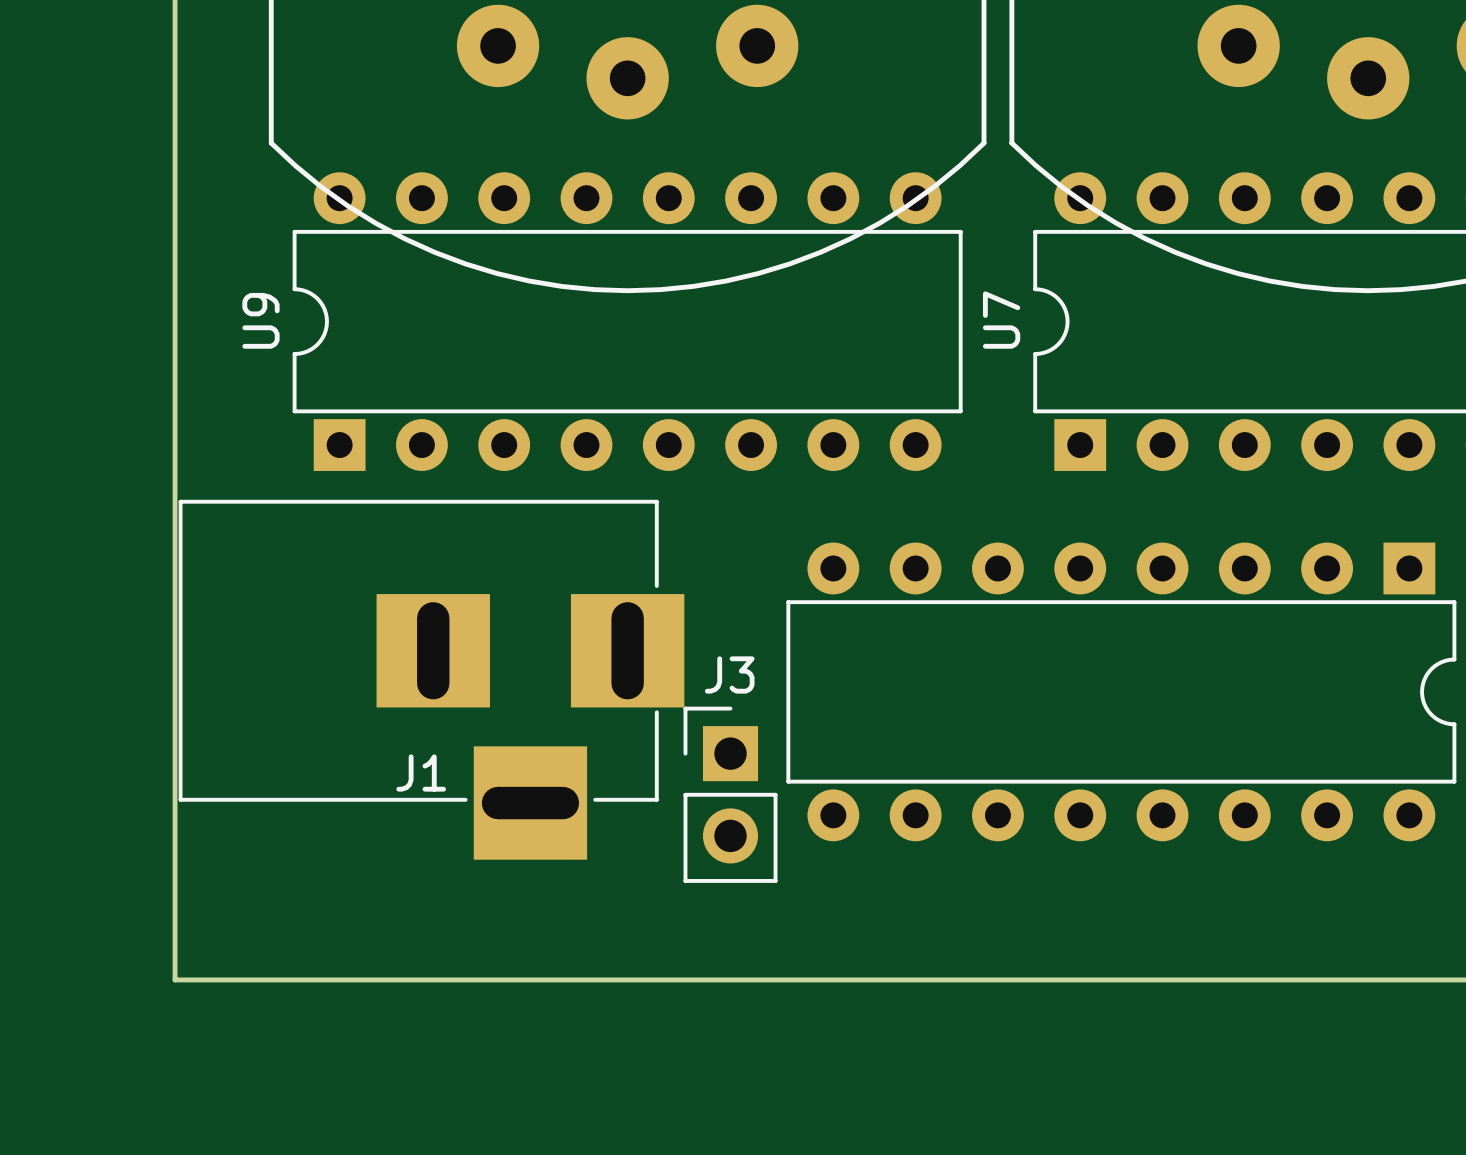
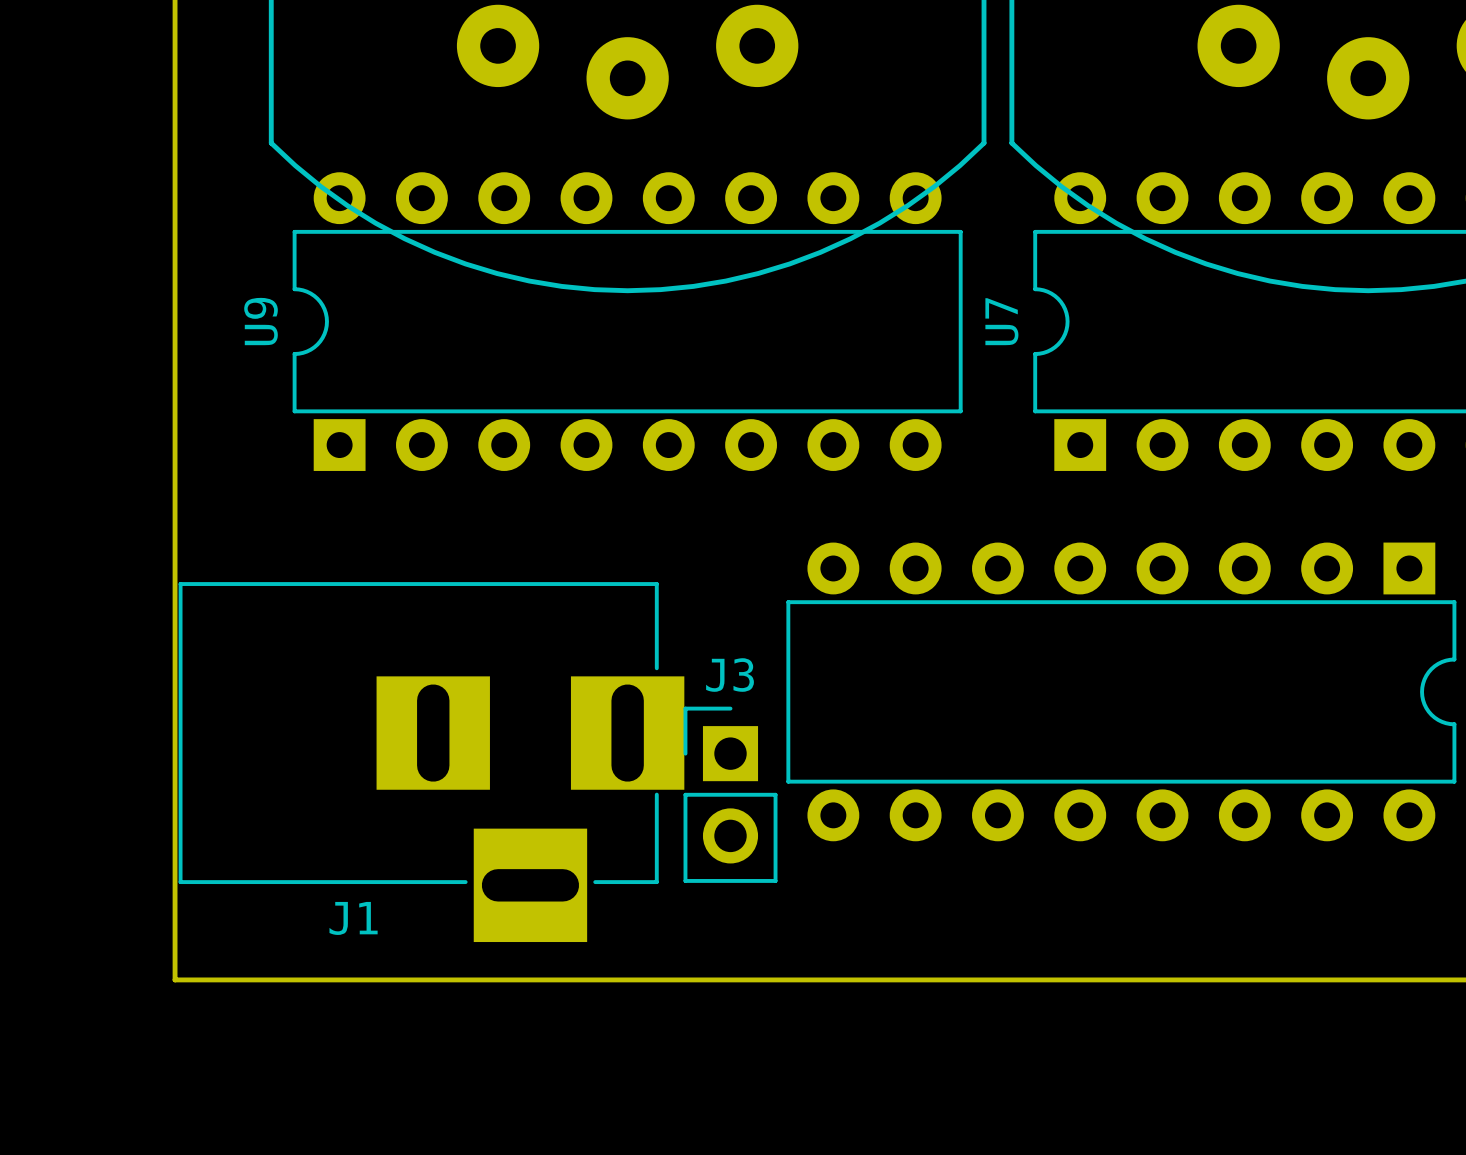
J1 position: (431, 679) -> (431, 762)
J1 name position: J1 (421, 772) -> J1 (353, 918)

